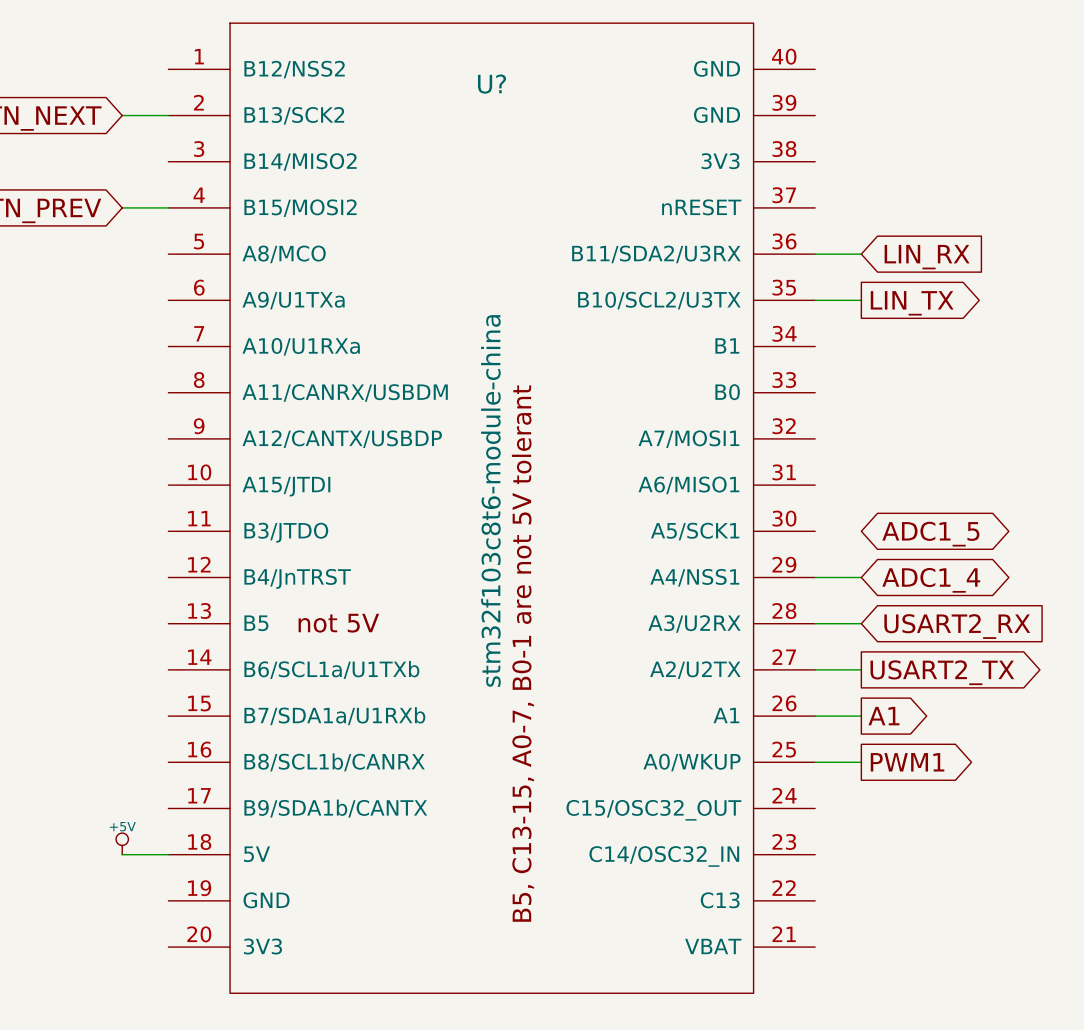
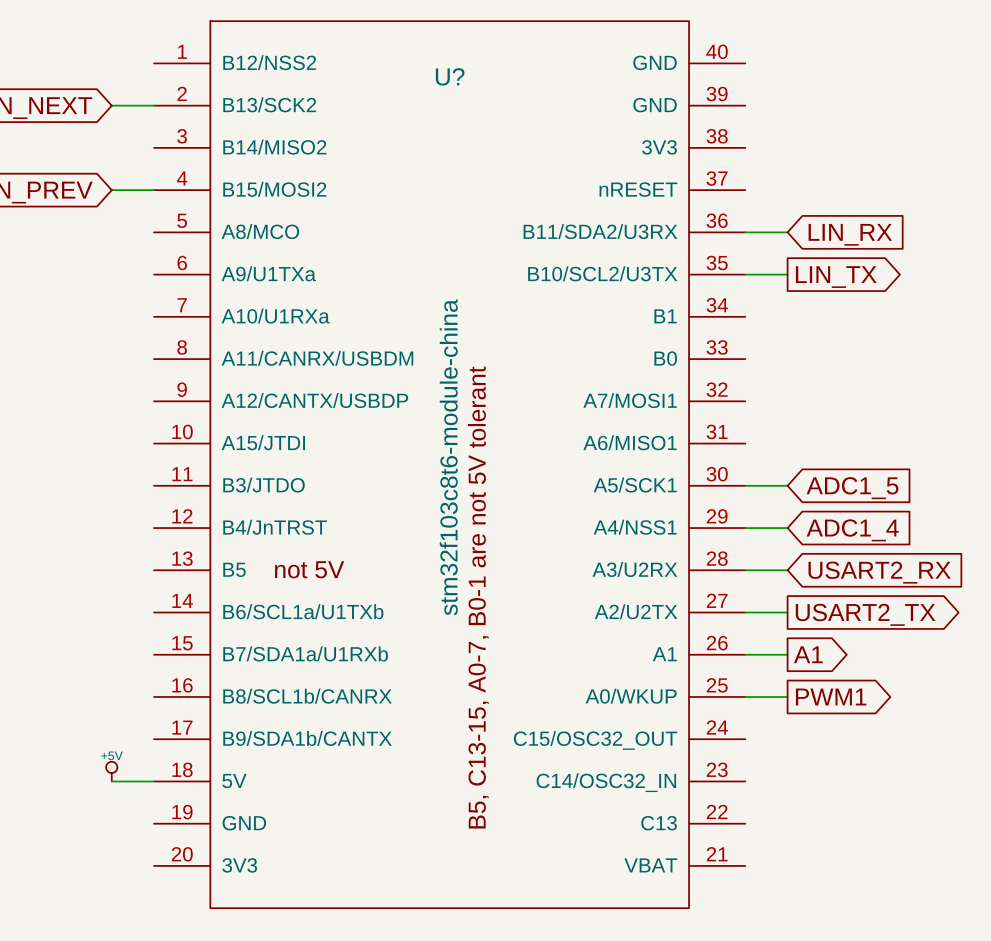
wire: none -> (745, 485) (787, 485)
global label shape: bidirectional (930, 534) -> input (852, 488)
global label shape: bidirectional (931, 580) -> input (852, 530)

